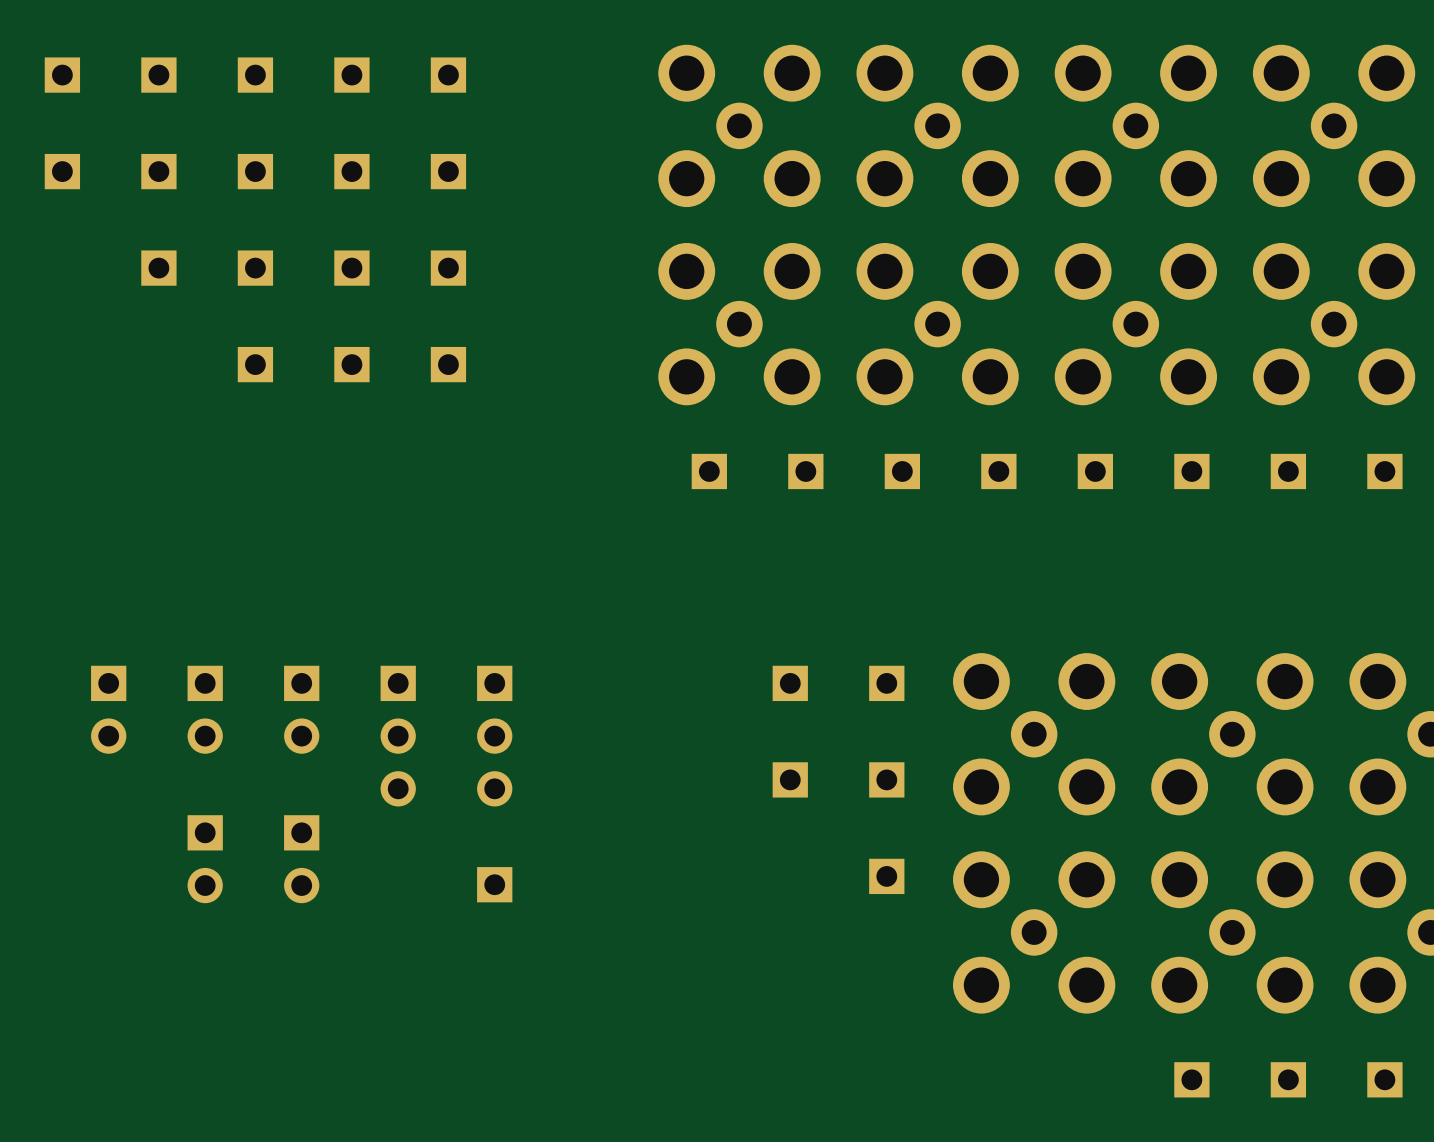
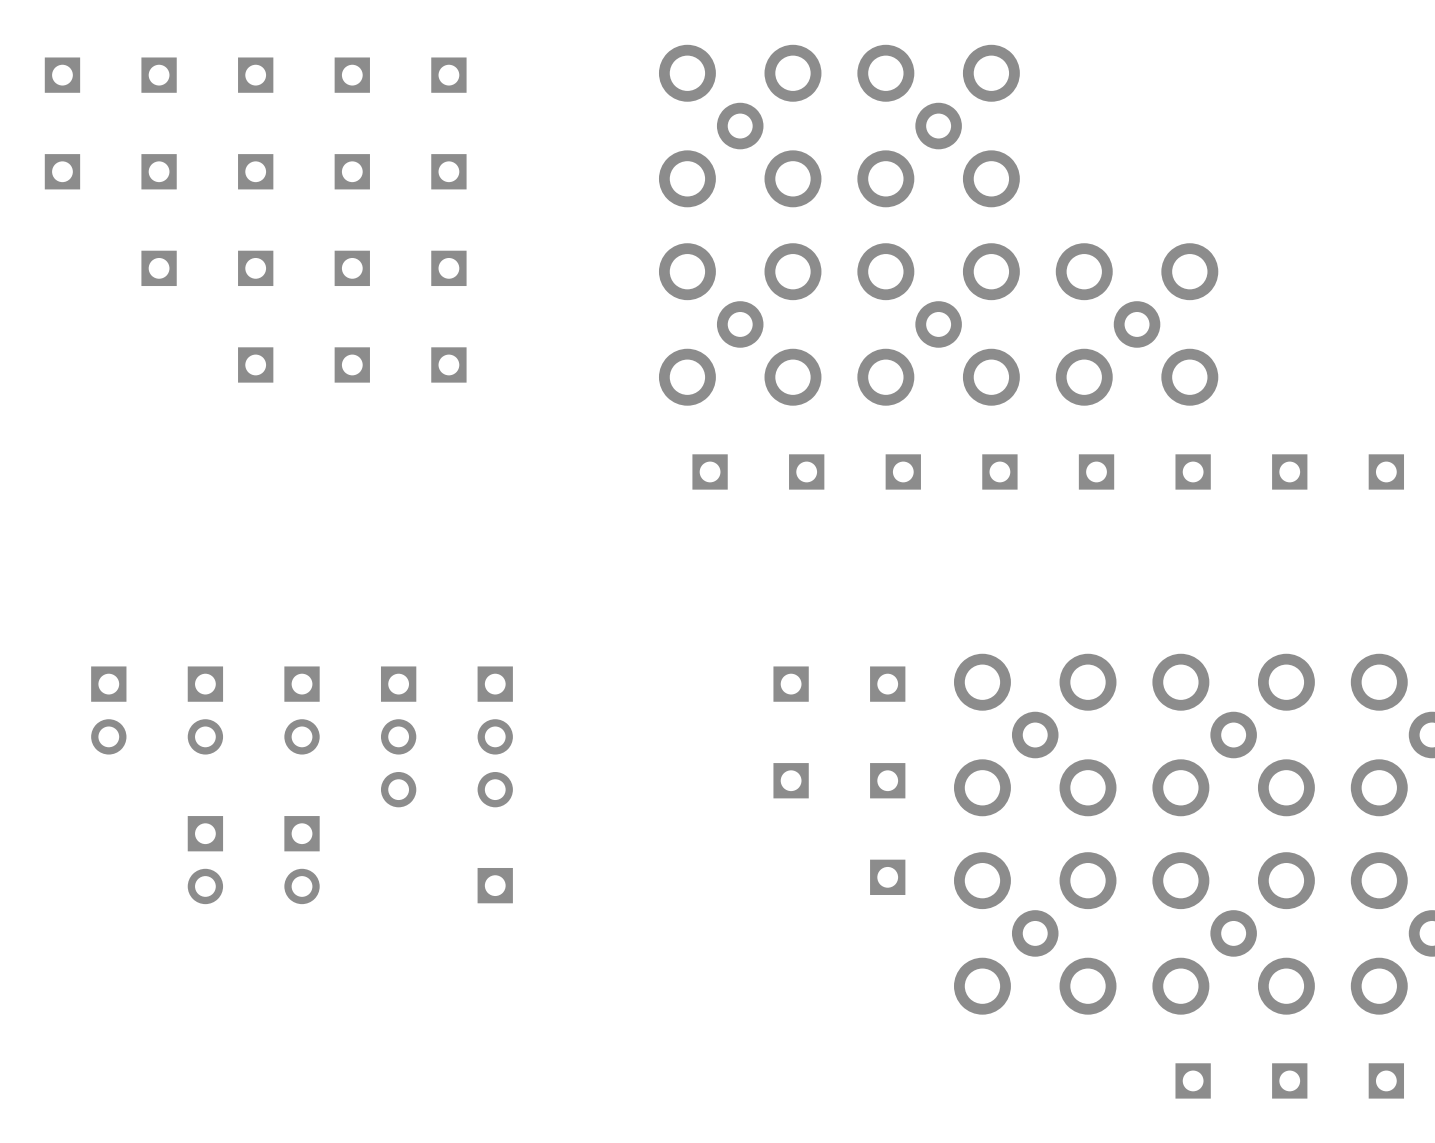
part: (1135, 125) -> none
part: (1334, 125) -> none
part: (1334, 324) -> none

